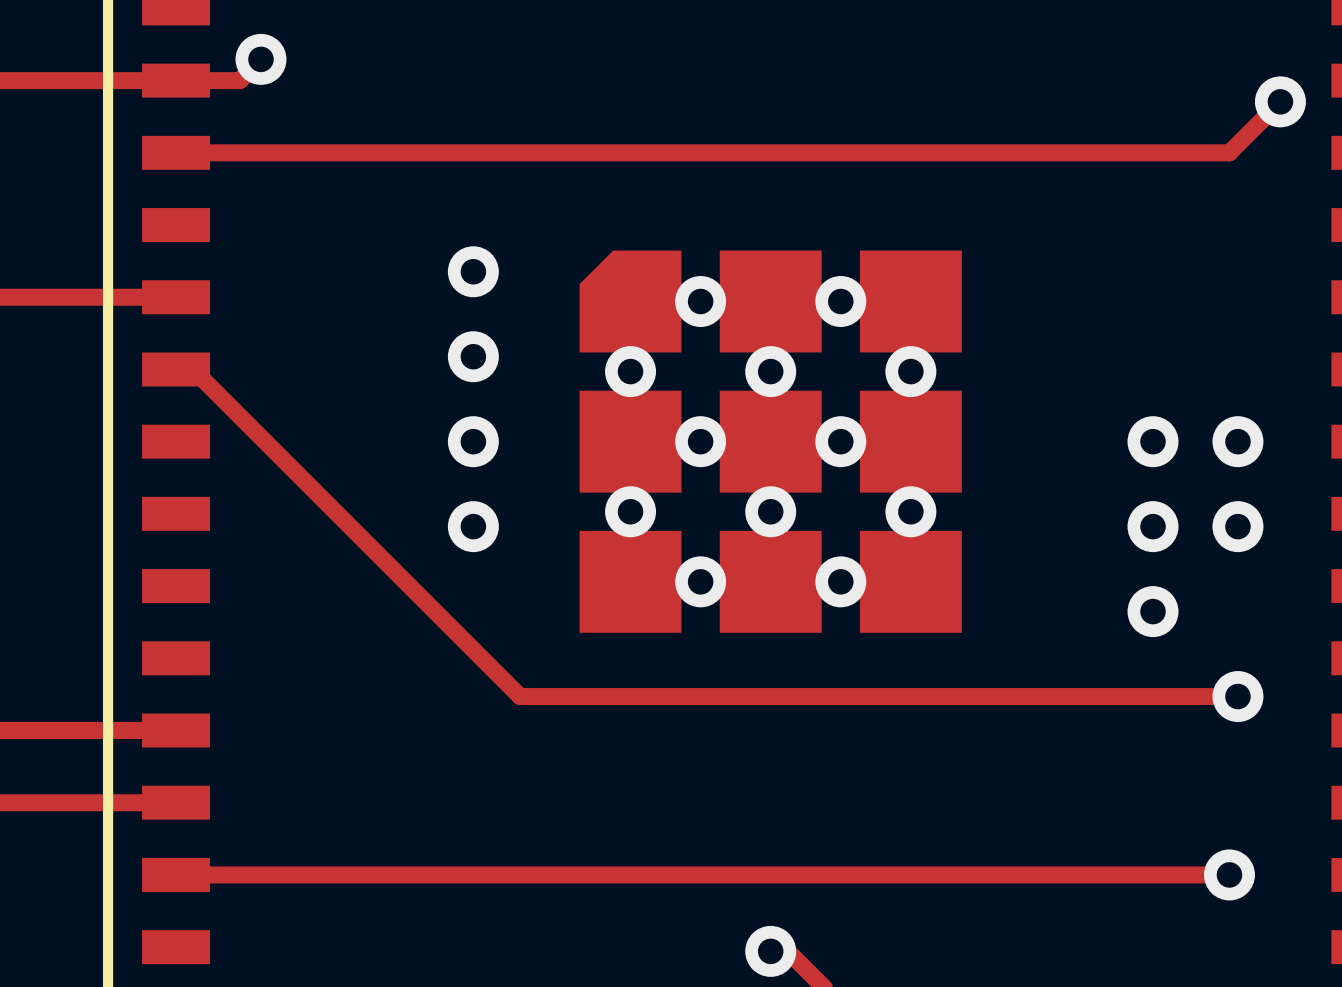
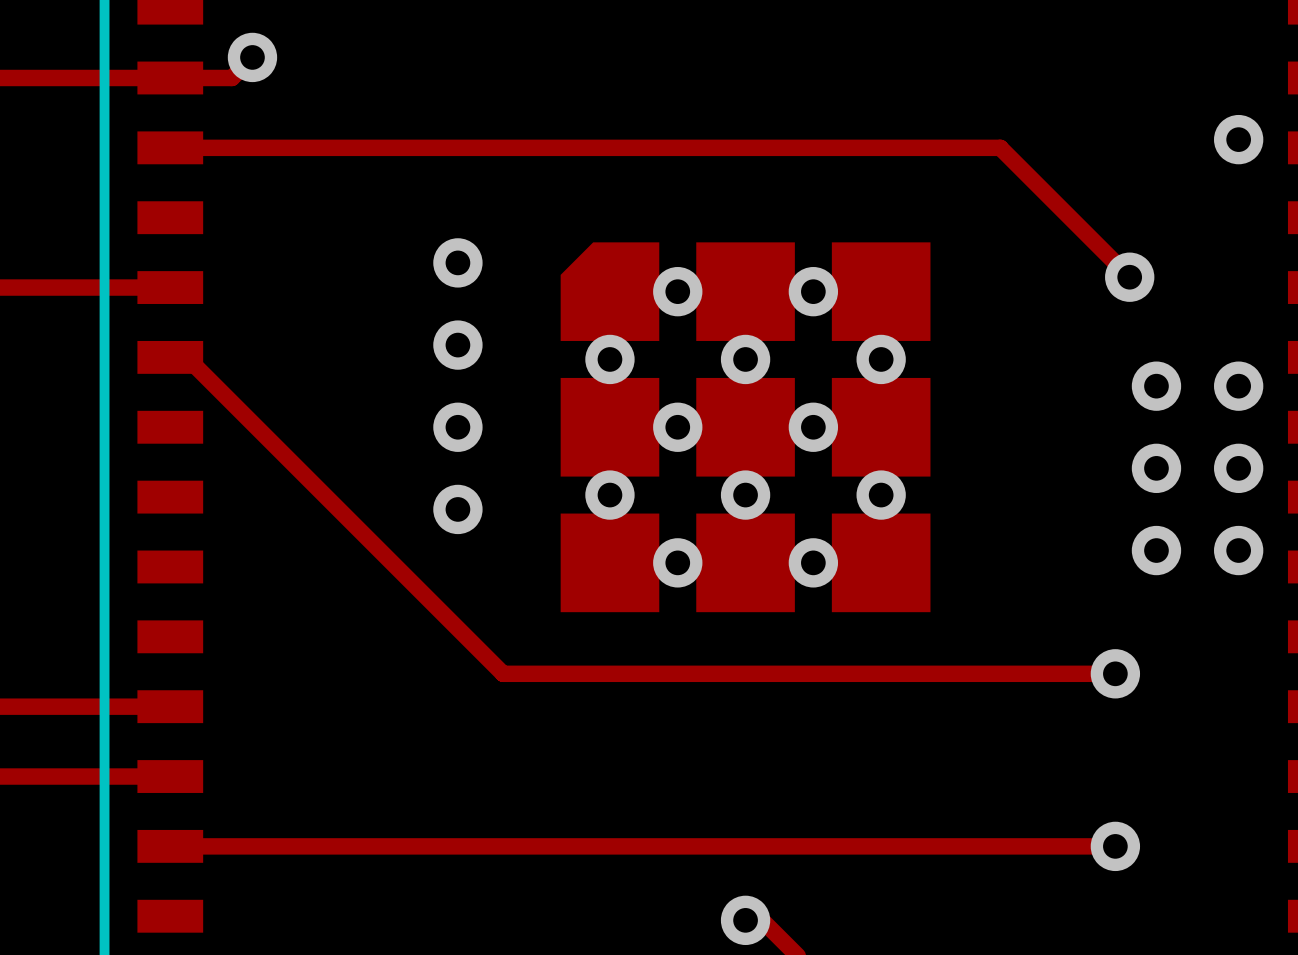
track: (1280, 101) (1229, 152) (1034, 152) -> (1129, 277) (1000, 147)
via position: (1280, 101) -> (1238, 139)
via: none -> (1129, 277)
via: none -> (1156, 386)
via: none -> (1238, 386)
via: (1153, 441) -> none
via: (1237, 441) -> none
via: none -> (1156, 468)
via: none -> (1238, 468)
via: (1153, 526) -> none
via: (1237, 526) -> none
via: none -> (1156, 550)
via: none -> (1238, 550)
via: (1153, 611) -> none
track: (1153, 696) (1237, 696) -> none
via: none -> (1115, 673)
via: (1237, 696) -> none
track: (1153, 874) (1229, 874) -> none
via position: (1229, 874) -> (1115, 846)

